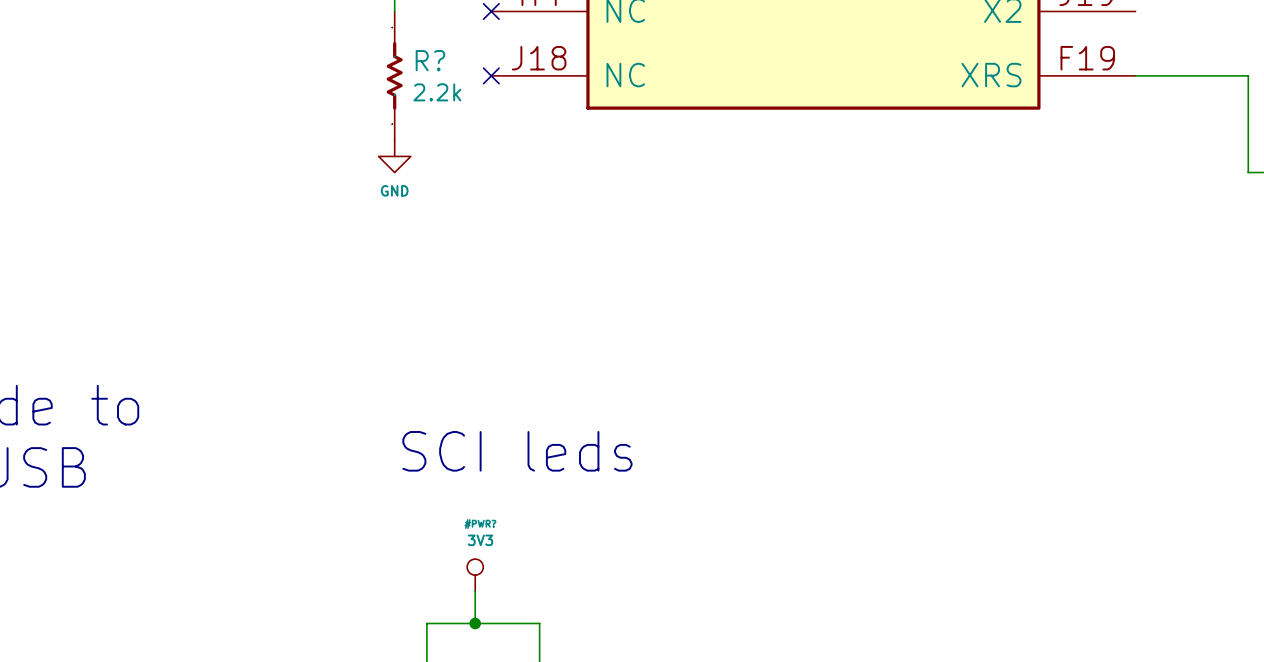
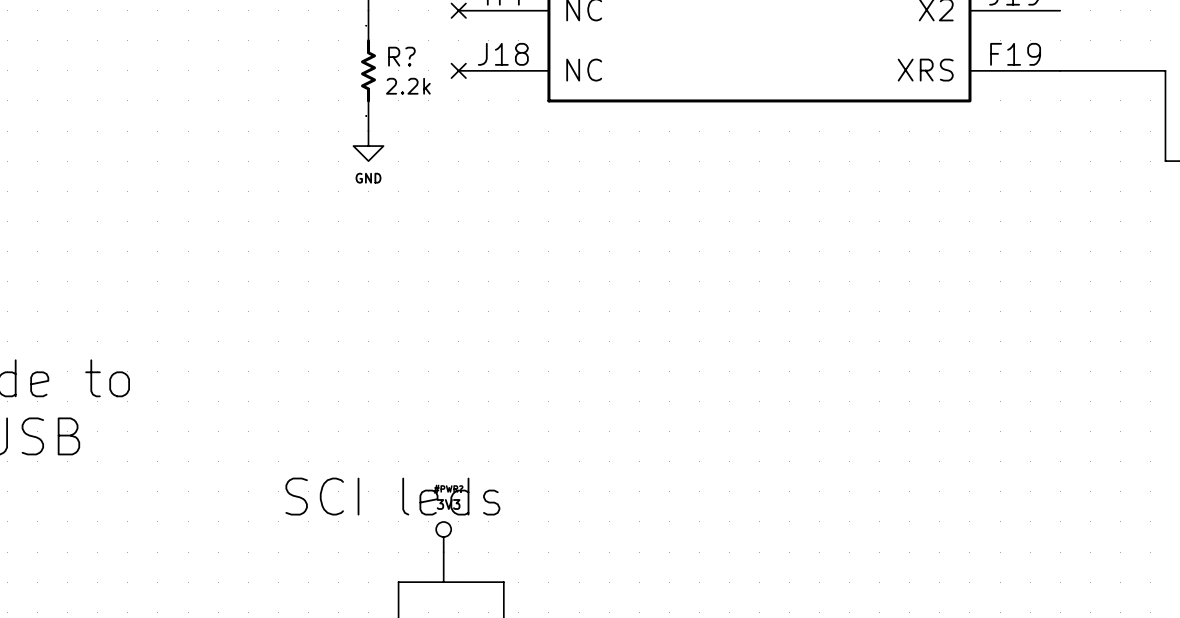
text position: SCI leds (517, 451) -> SCI leds (392, 496)
junction: (475, 623) -> none

